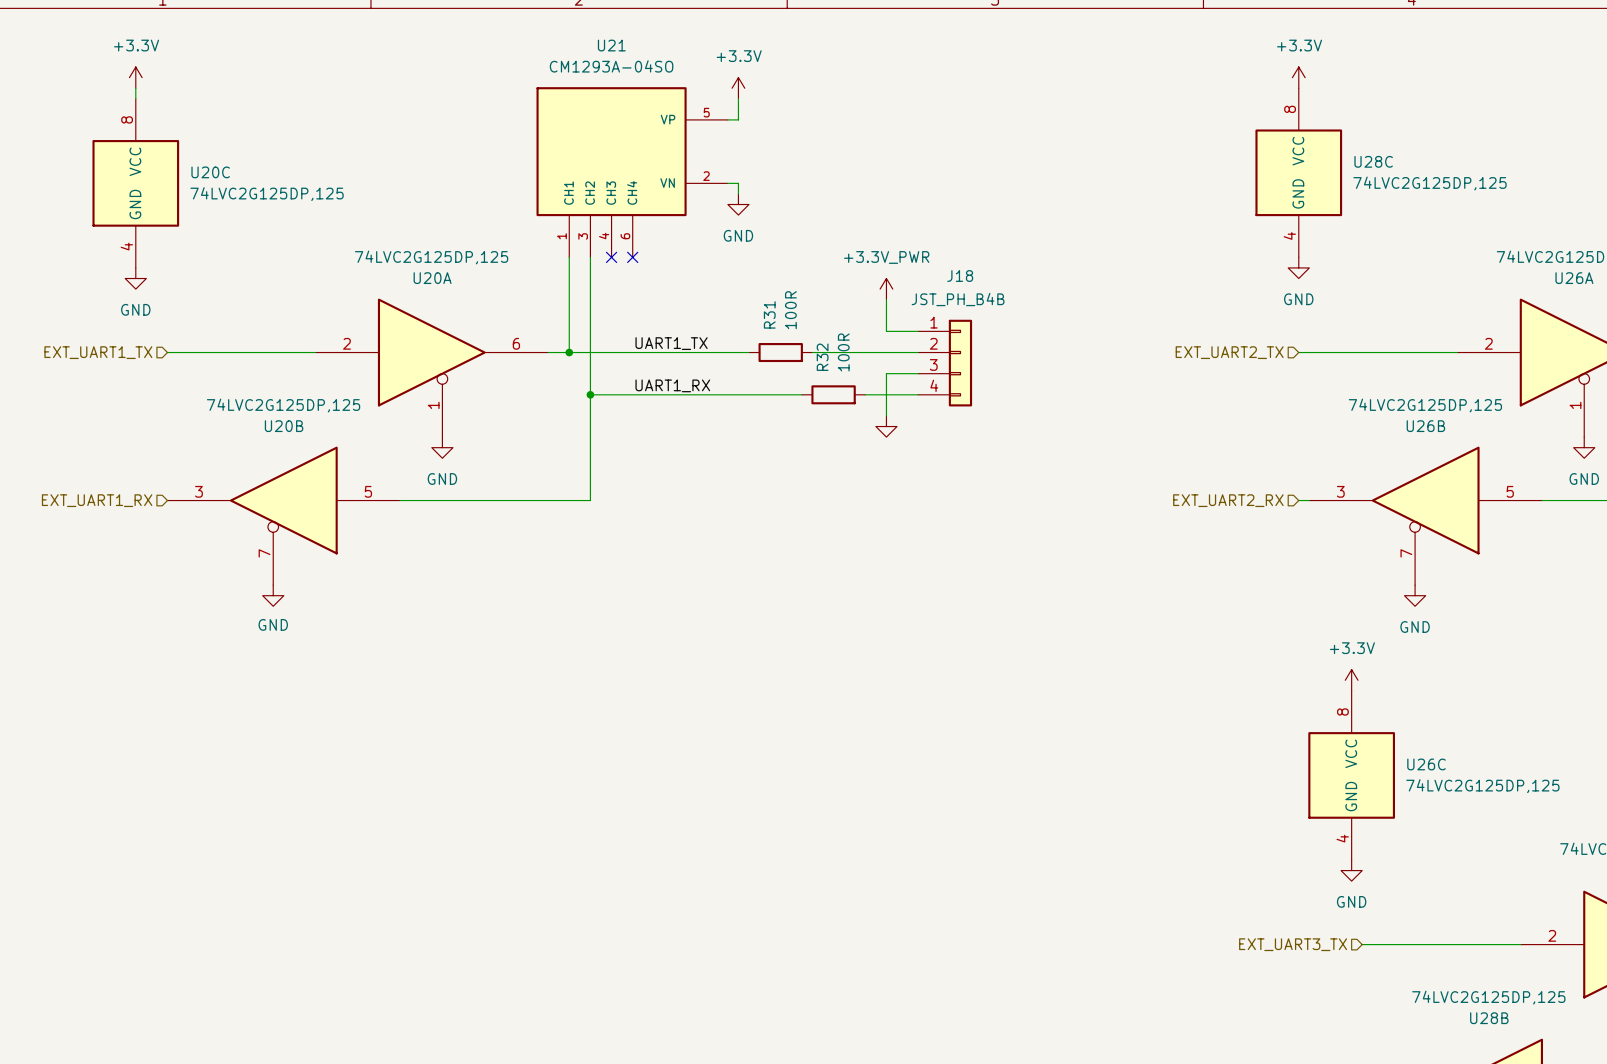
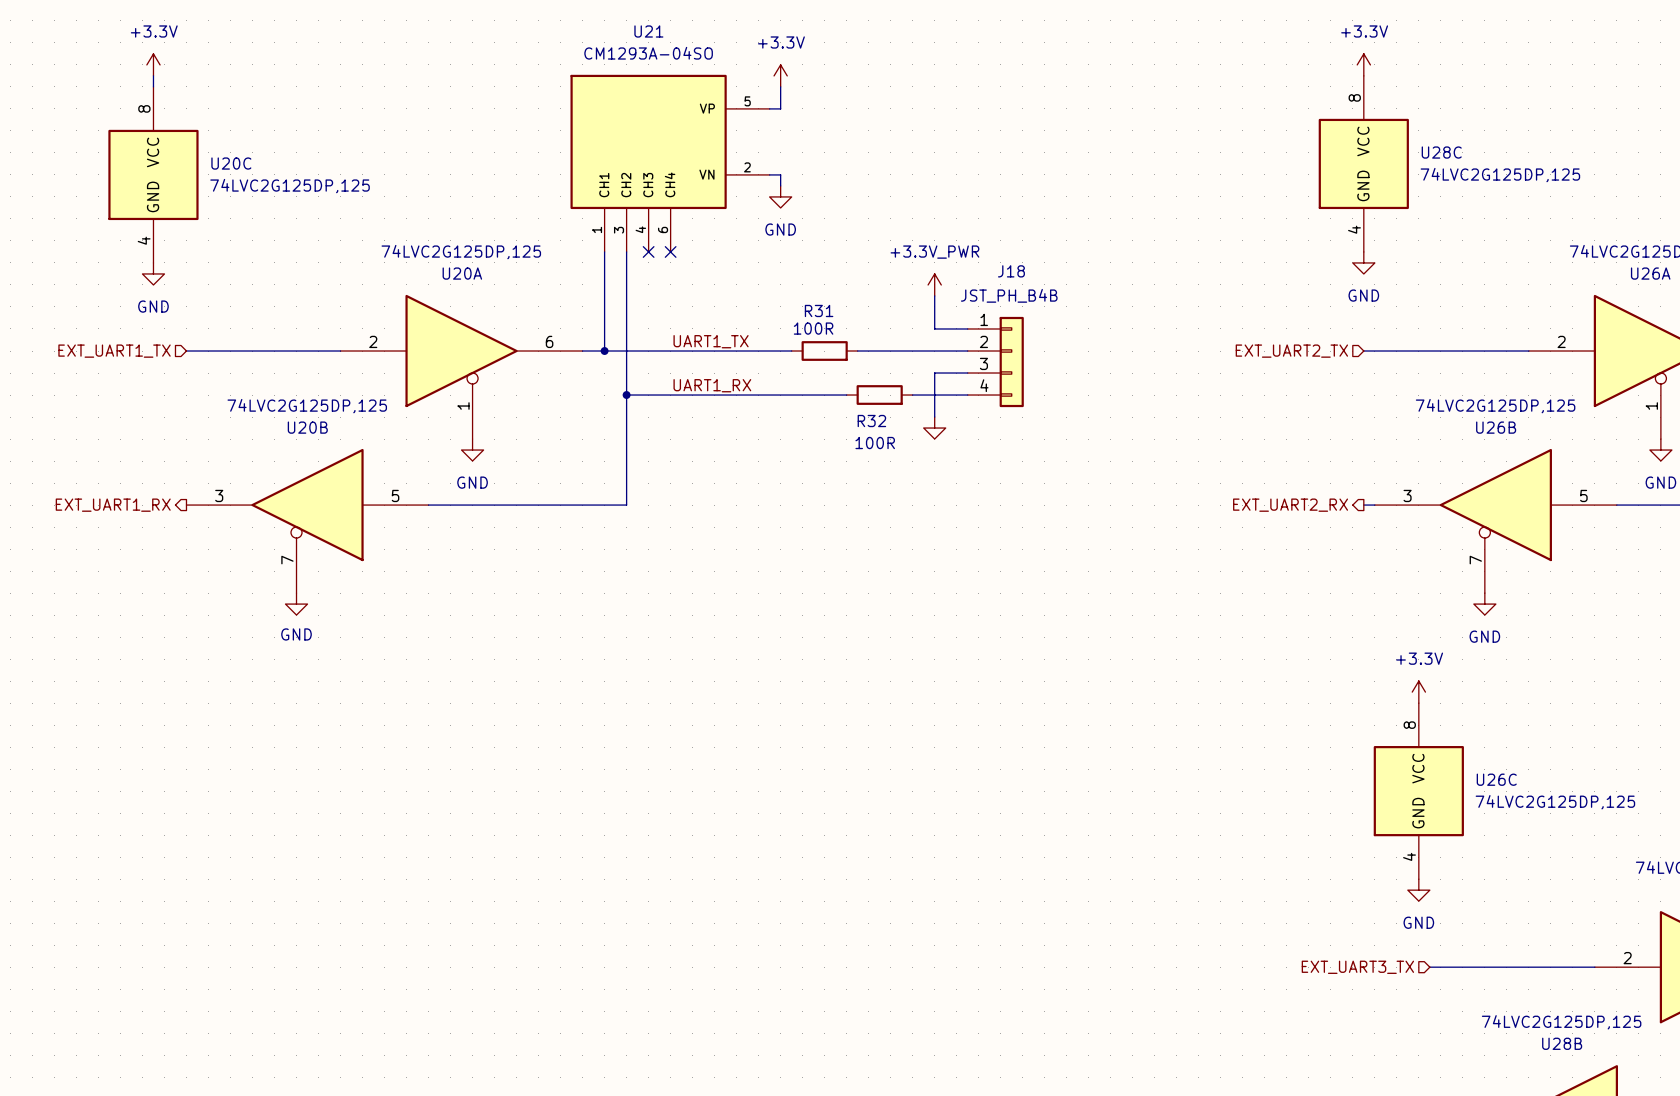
R31 value rotation: 0° (790, 310) -> 90° clockwise (813, 328)
R31 name rotation: 0° (769, 314) -> 90° clockwise (819, 310)
R32 value rotation: 0° (843, 352) -> 90° clockwise (875, 443)
R32 value position: 100R (843, 352) -> 100R (875, 443)
R32 name rotation: 0° (822, 357) -> 90° clockwise (871, 421)
R32 name position: R32 (822, 357) -> R32 (871, 421)
hierarchical label shape: input (97, 500) -> output (113, 505)
hierarchical label shape: input (1228, 500) -> output (1290, 505)

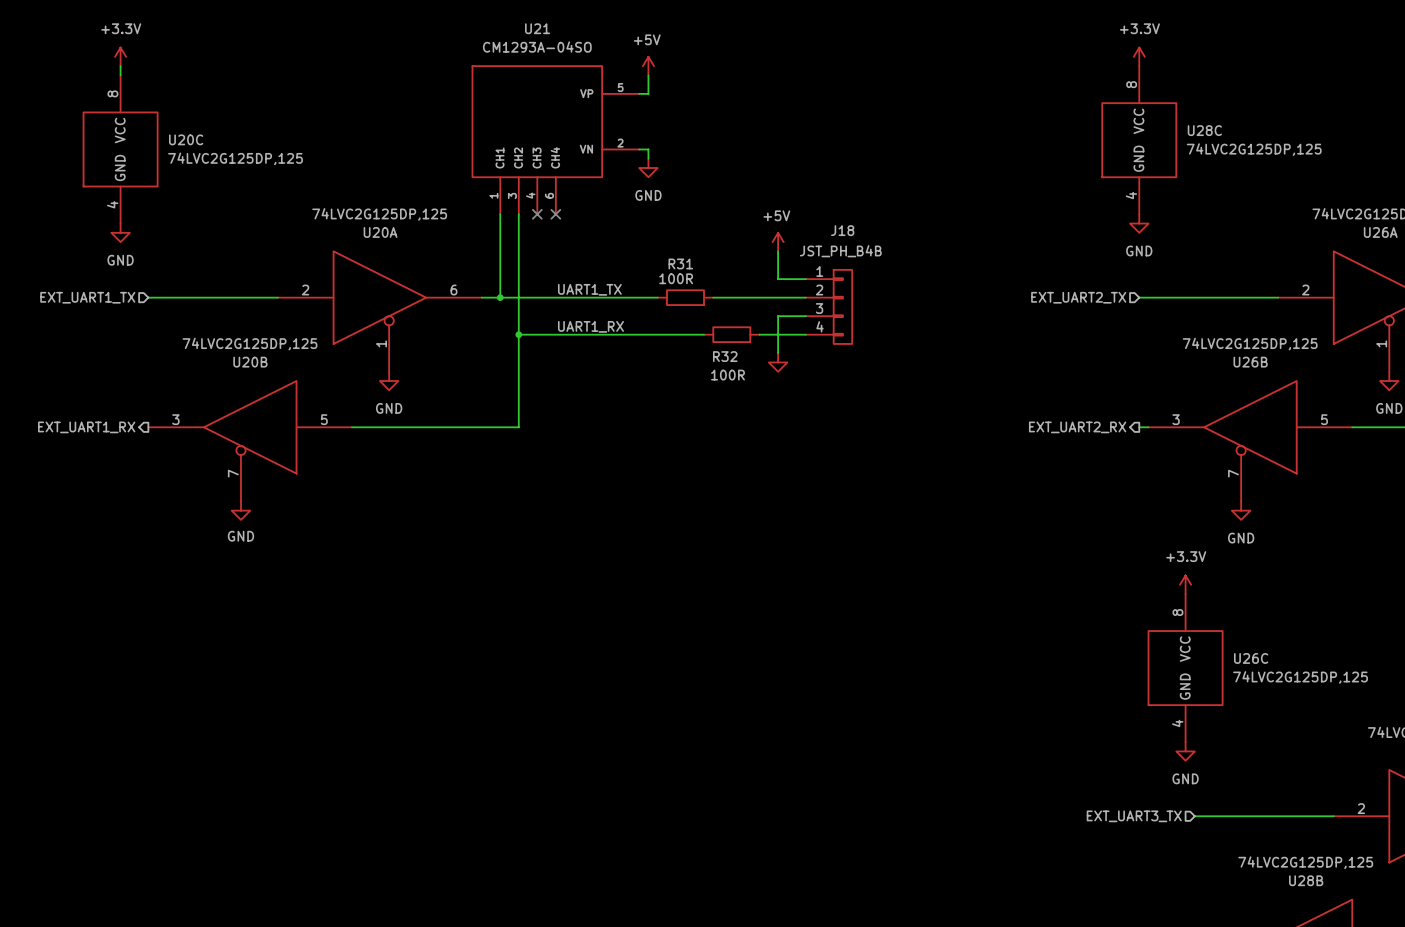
power symbol: +3.3V (780, 75) -> +5V (648, 66)
power symbol: +3.3V_PWR (934, 284) -> +5V (778, 242)

